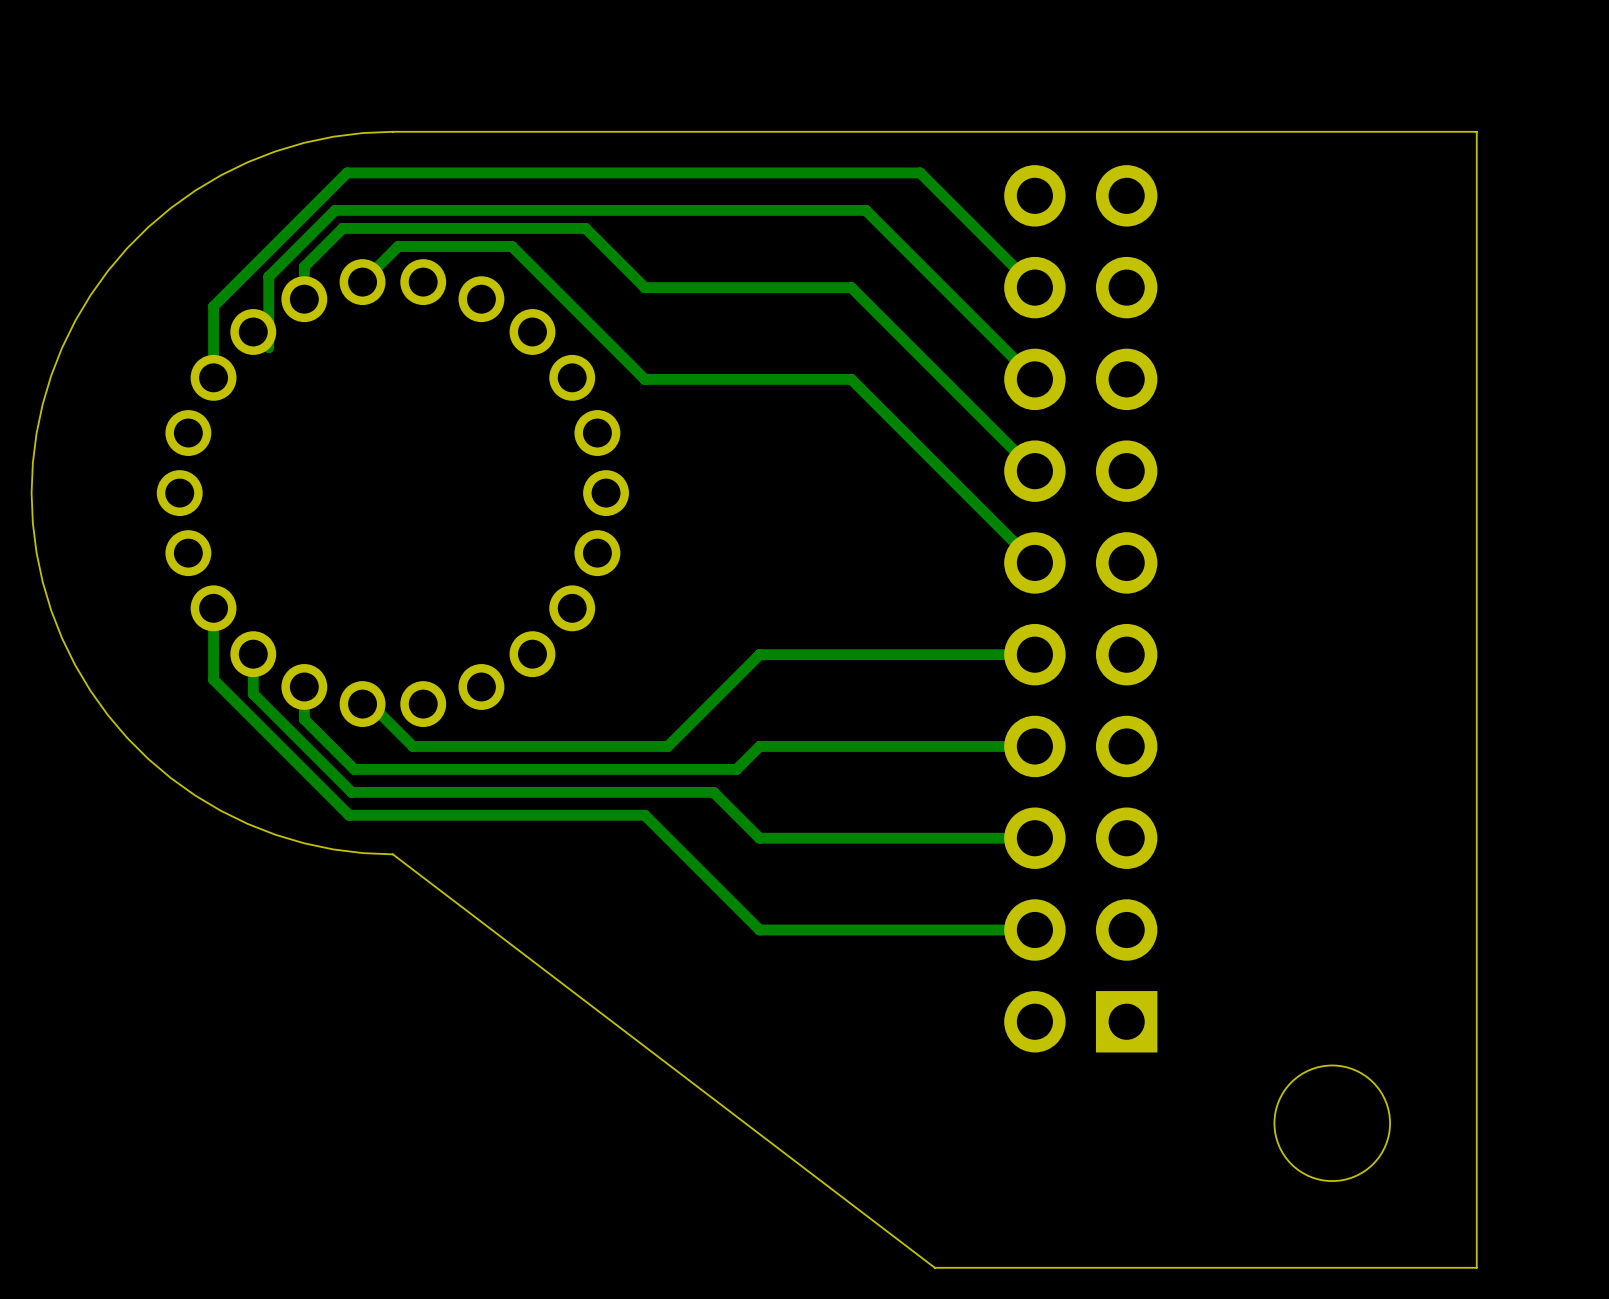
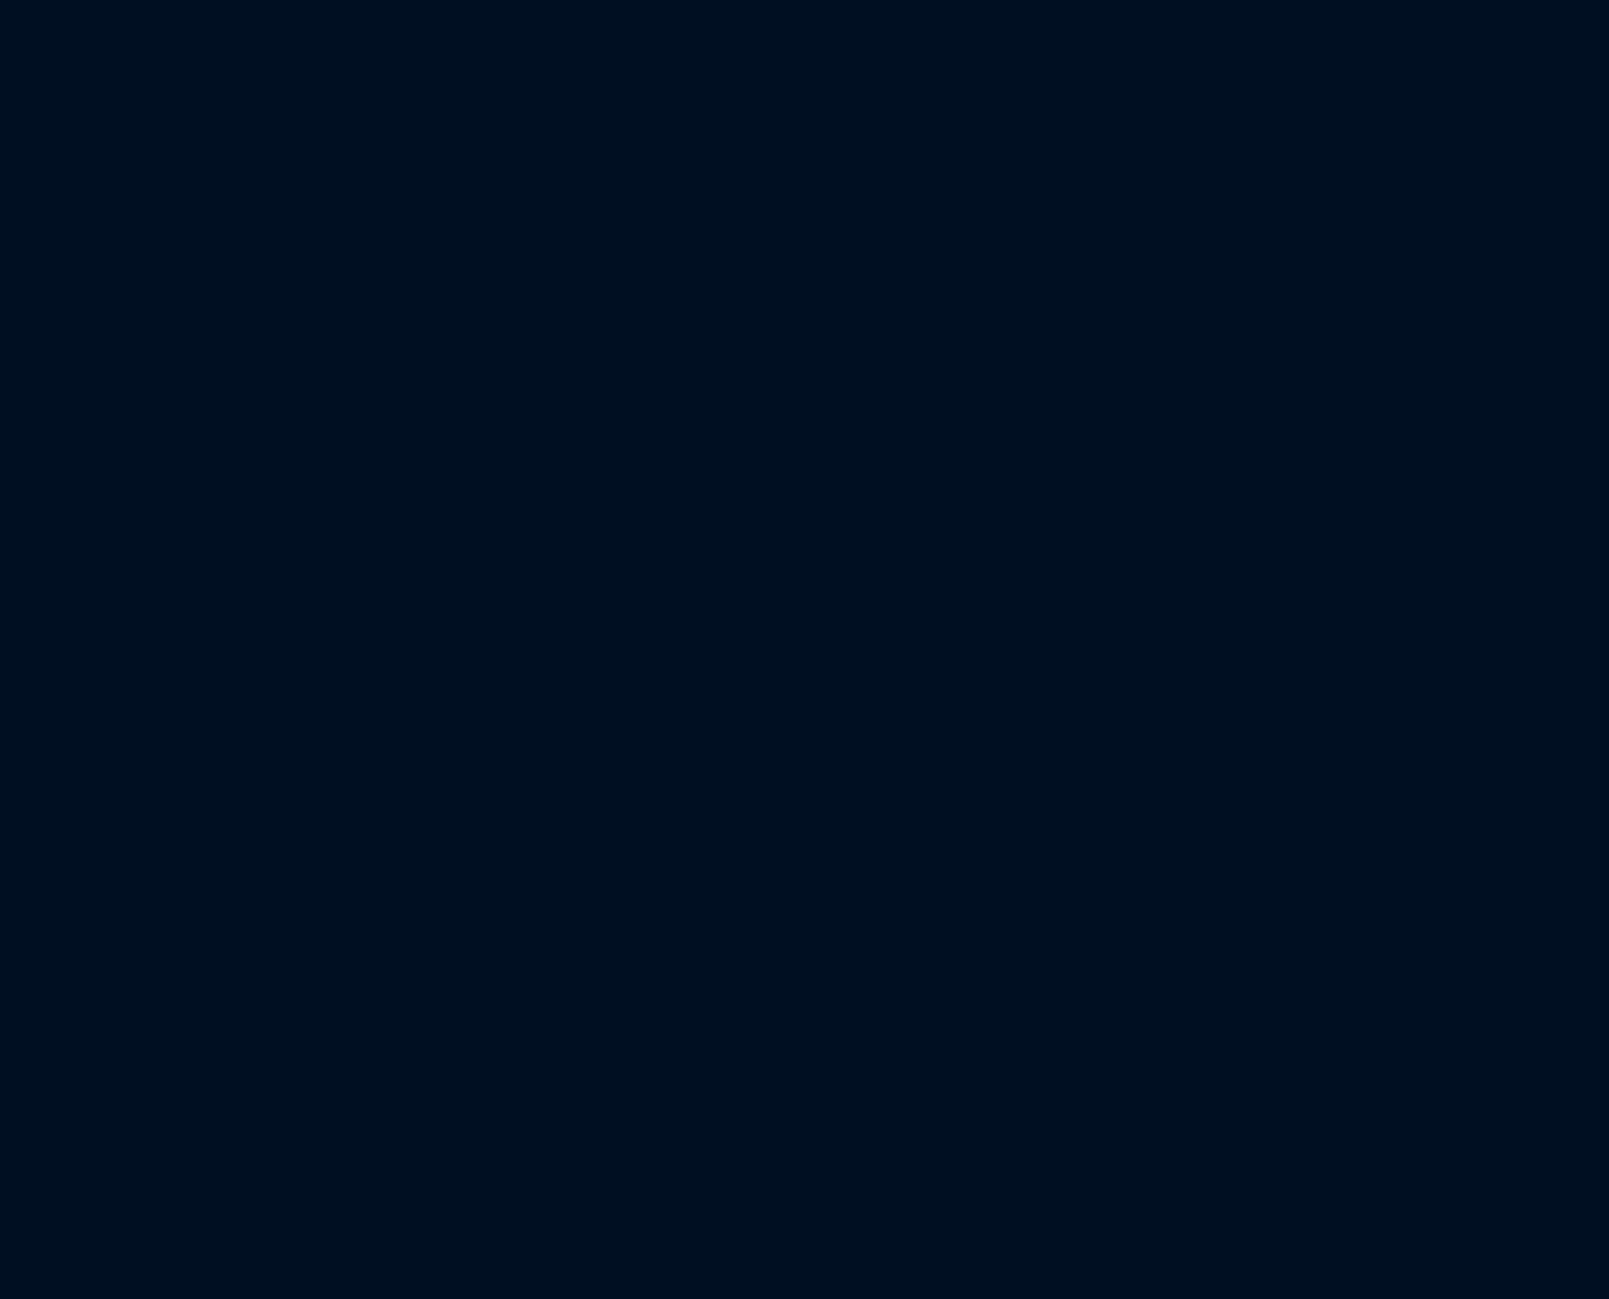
board edge: (1476, 131) (1476, 1267) (934, 1267) (392, 854) (333, 849) (275, 834) (220, 810) (170, 778) (127, 737) (90, 690) (62, 638) (51, 610) (36, 552) (31, 493) (36, 433) (42, 404) (62, 347) (90, 295) (127, 248) (148, 227) (195, 190) (247, 162) (275, 151) (333, 136) (392, 131) (1476, 131) -> none
track: (362, 282) (398, 246) (512, 246) (644, 379) (851, 379) (1034, 562) -> none
track: (1034, 287) (920, 172) (347, 172) (213, 306) (213, 377) -> none
track: (304, 299) (304, 266) (342, 228) (585, 228) (644, 287) (851, 287) (1034, 471) -> none
track: (253, 331) (268, 347) (268, 276) (335, 210) (865, 210) (1034, 379) -> none
part: (392, 493) -> none
track: (213, 608) (213, 679) (349, 815) (644, 815) (759, 929) (1034, 929) -> none
part: (1080, 608) -> none
track: (253, 654) (253, 693) (351, 792) (713, 792) (759, 838) (1034, 838) -> none
track: (1034, 654) (759, 654) (667, 746) (412, 746) (370, 704) (362, 704) -> none
track: (304, 686) (304, 719) (354, 769) (736, 769) (759, 746) (1034, 746) -> none
round board edge: [1273, 1064, 1391, 1182] -> none

